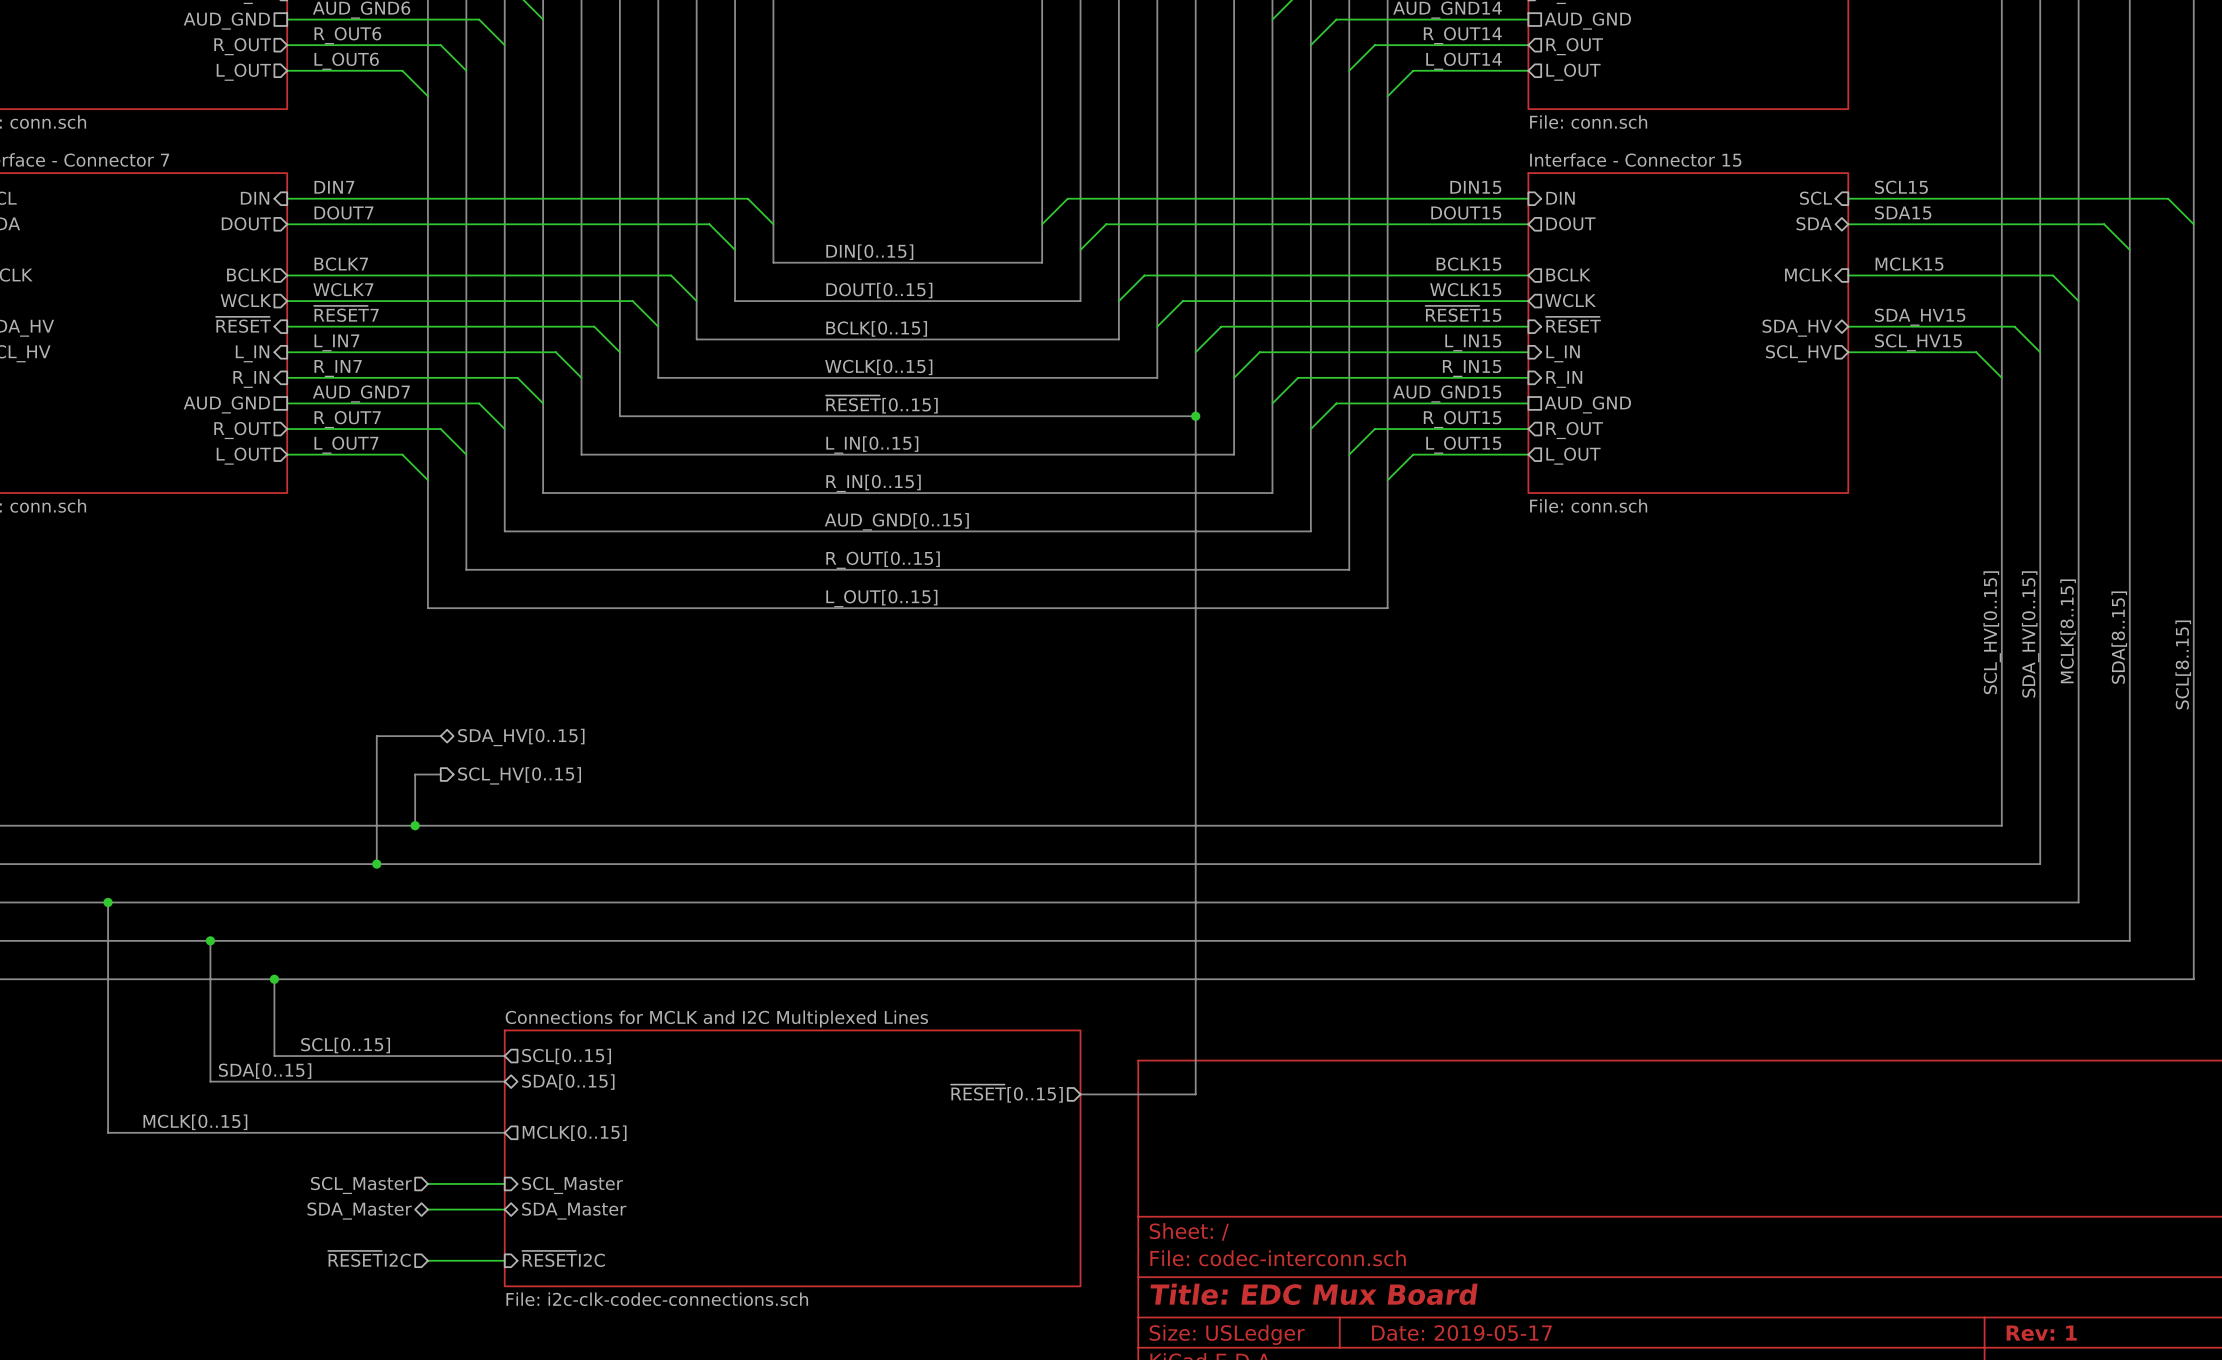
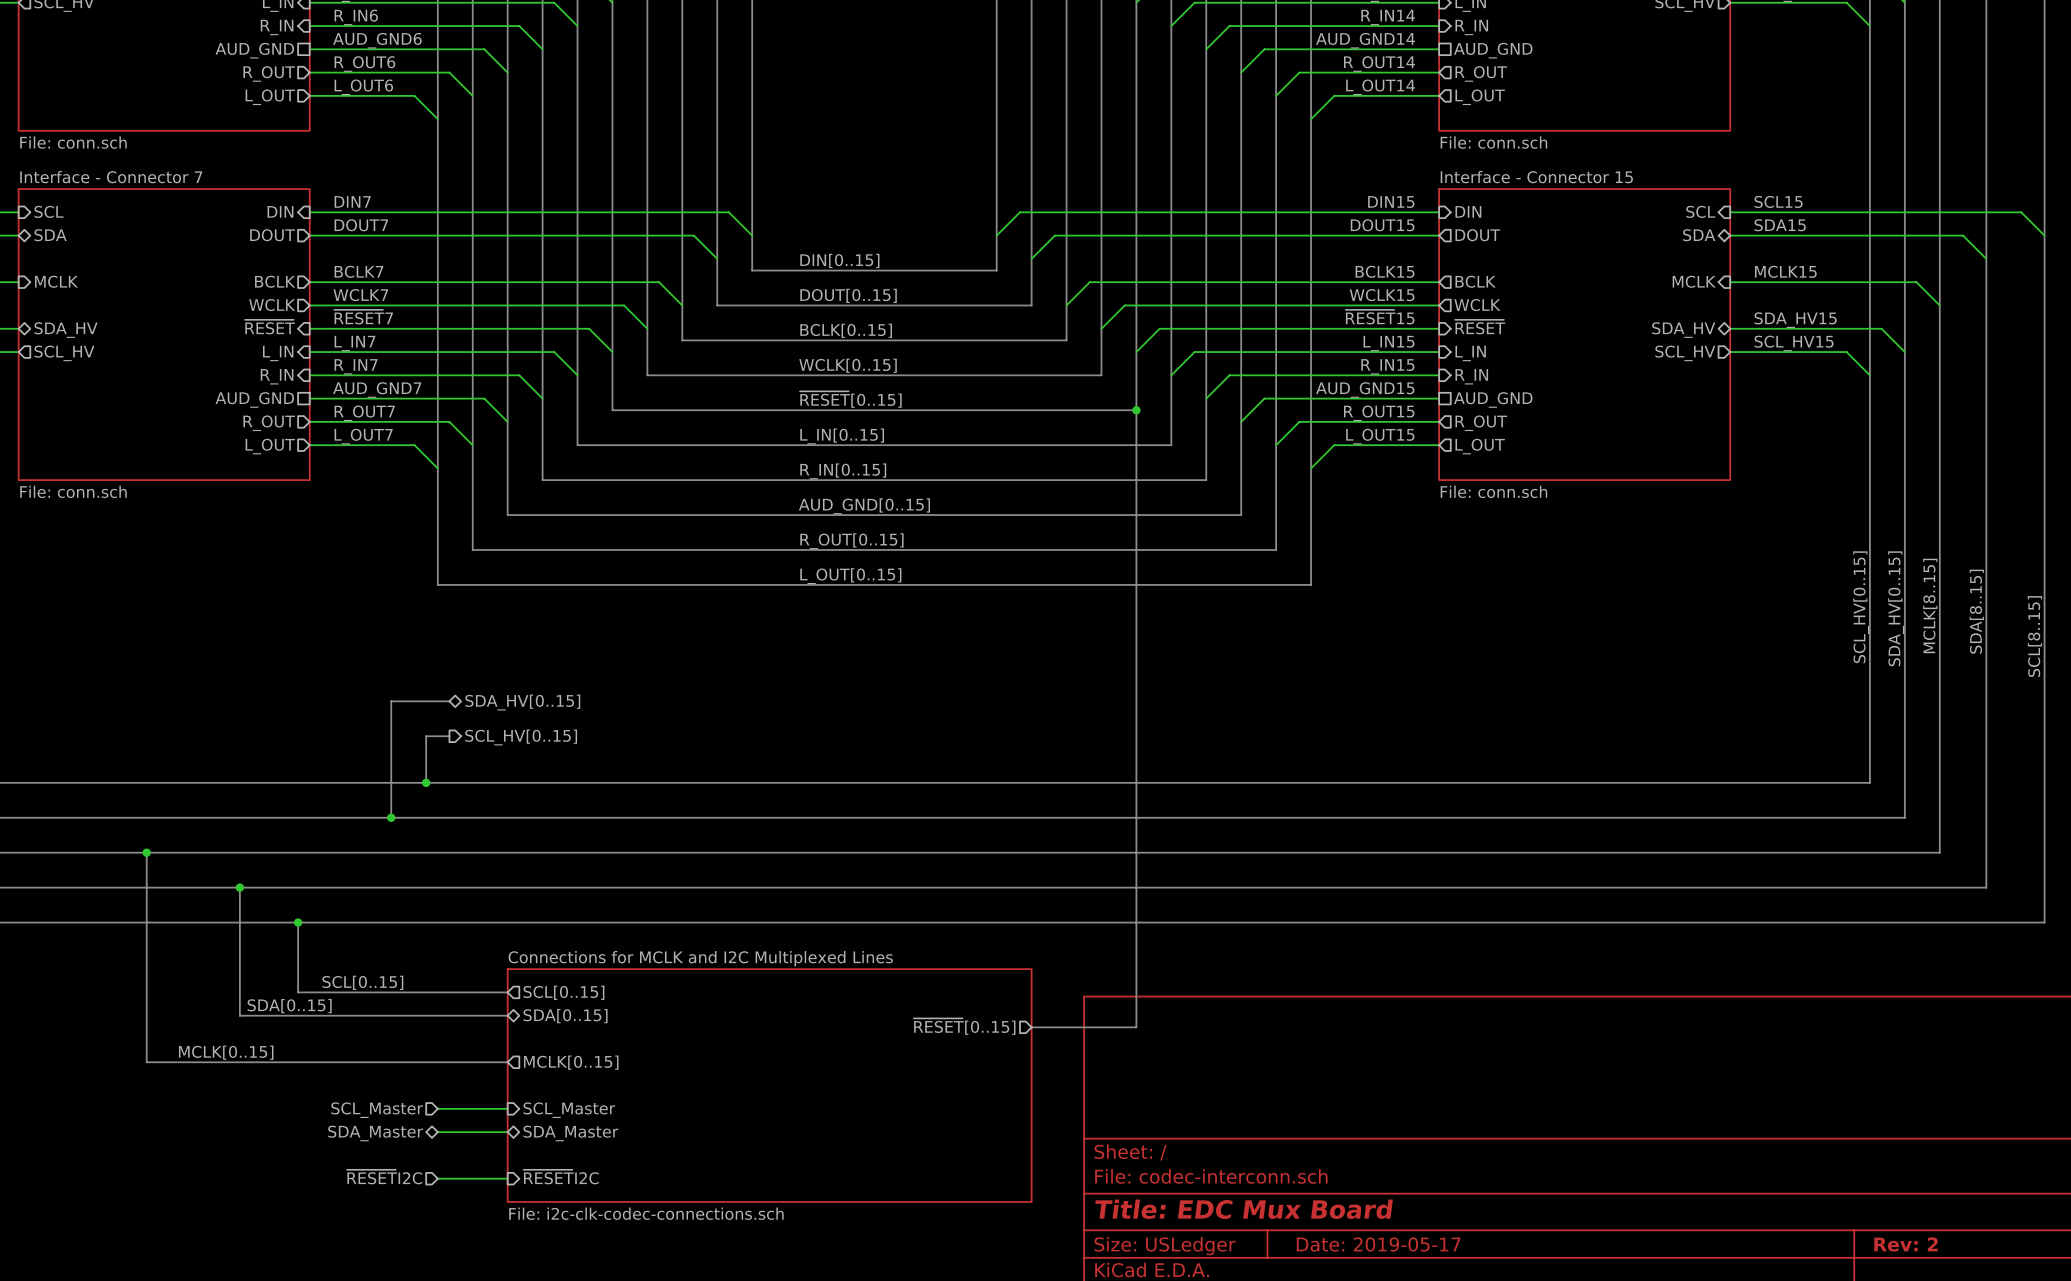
title block: Rev: 1 (2041, 1333) -> Rev: 2 (1906, 1244)

